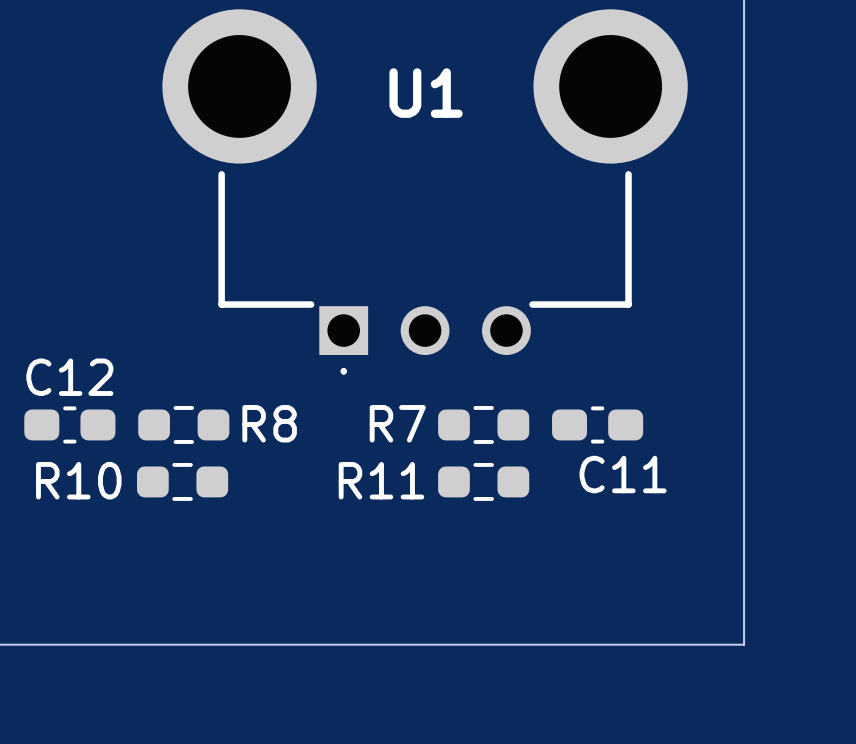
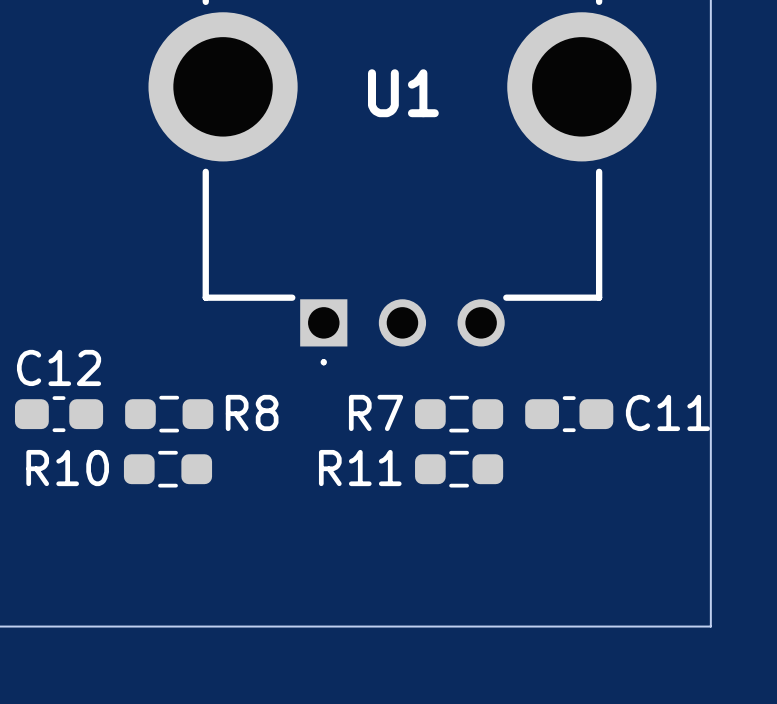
C11 name position: C11 (623, 474) -> C11 (667, 412)

